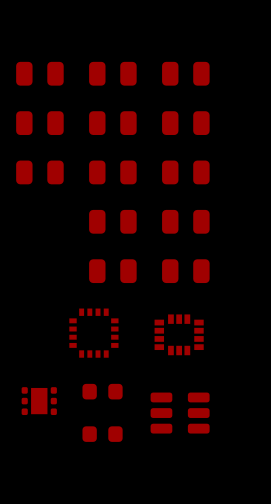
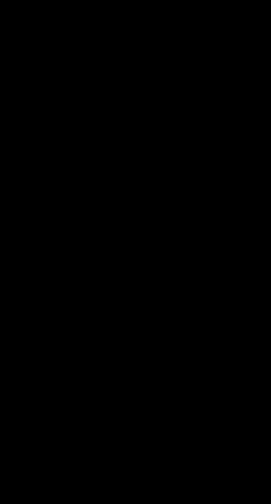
part: (39, 73) -> none
part: (112, 73) -> none
part: (185, 73) -> none
part: (39, 123) -> none
part: (112, 123) -> none
part: (185, 123) -> none
part: (39, 172) -> none
part: (112, 172) -> none
part: (185, 172) -> none
part: (112, 221) -> none
part: (185, 221) -> none
part: (112, 271) -> none
part: (185, 271) -> none
part: (93, 333) -> none
part: (179, 334) -> none
part: (102, 391) -> none
part: (39, 401) -> none
part: (180, 413) -> none
part: (102, 434) -> none

